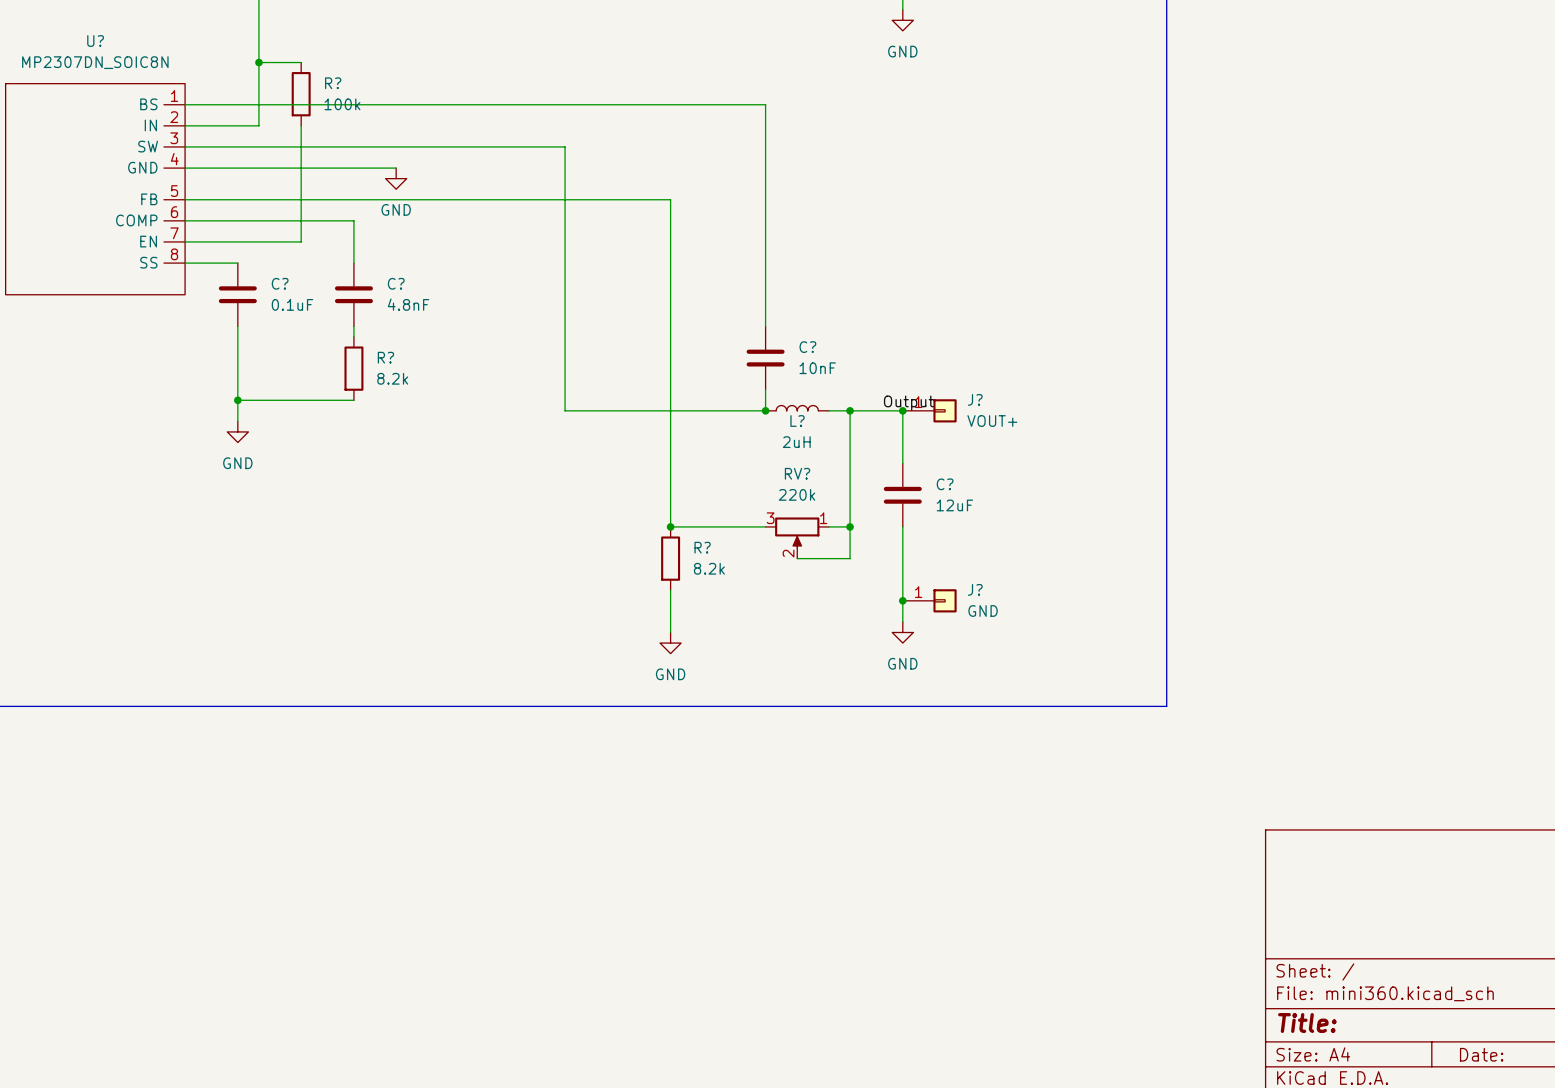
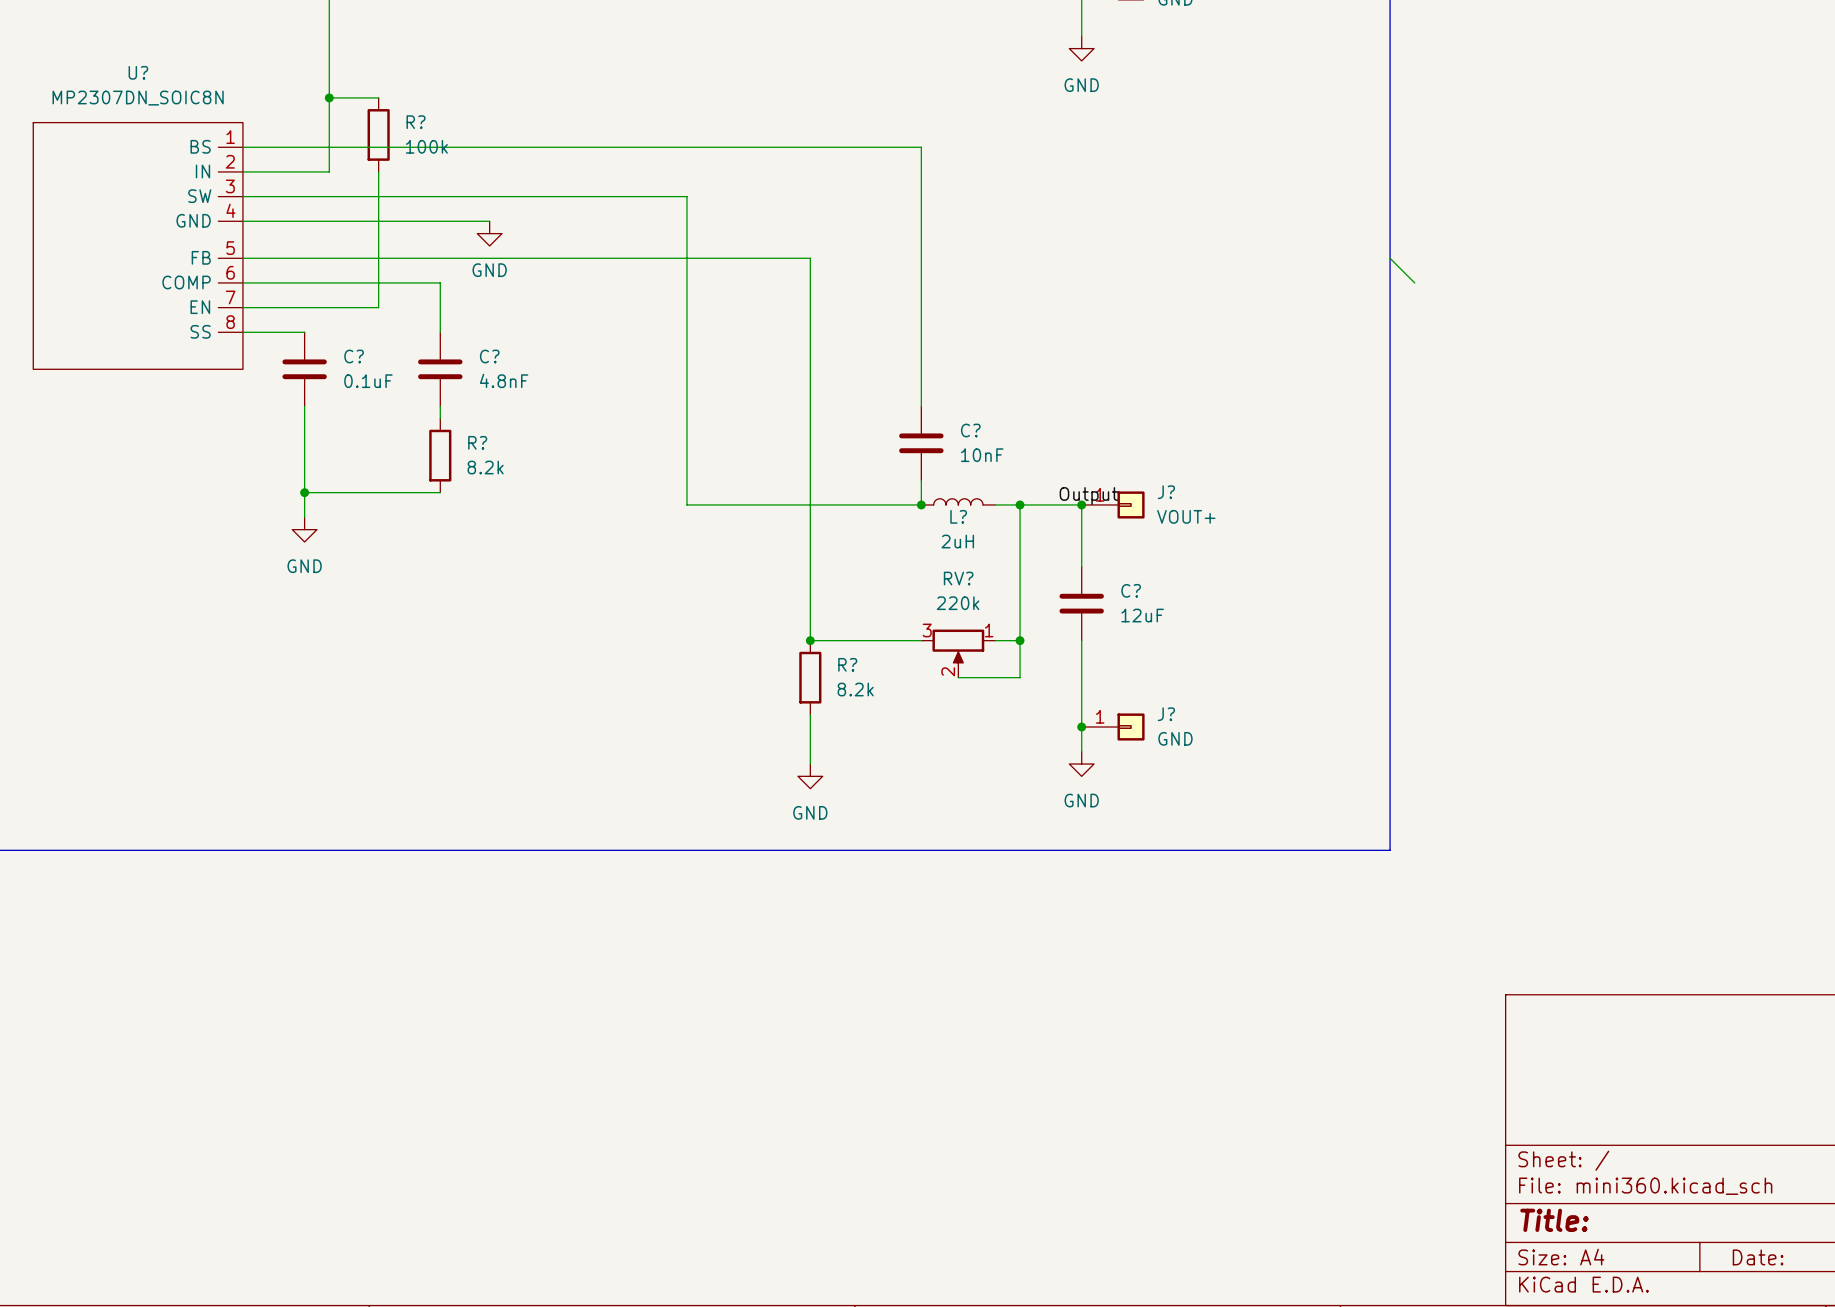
wire: none -> (1390, 258) (1414, 282)

